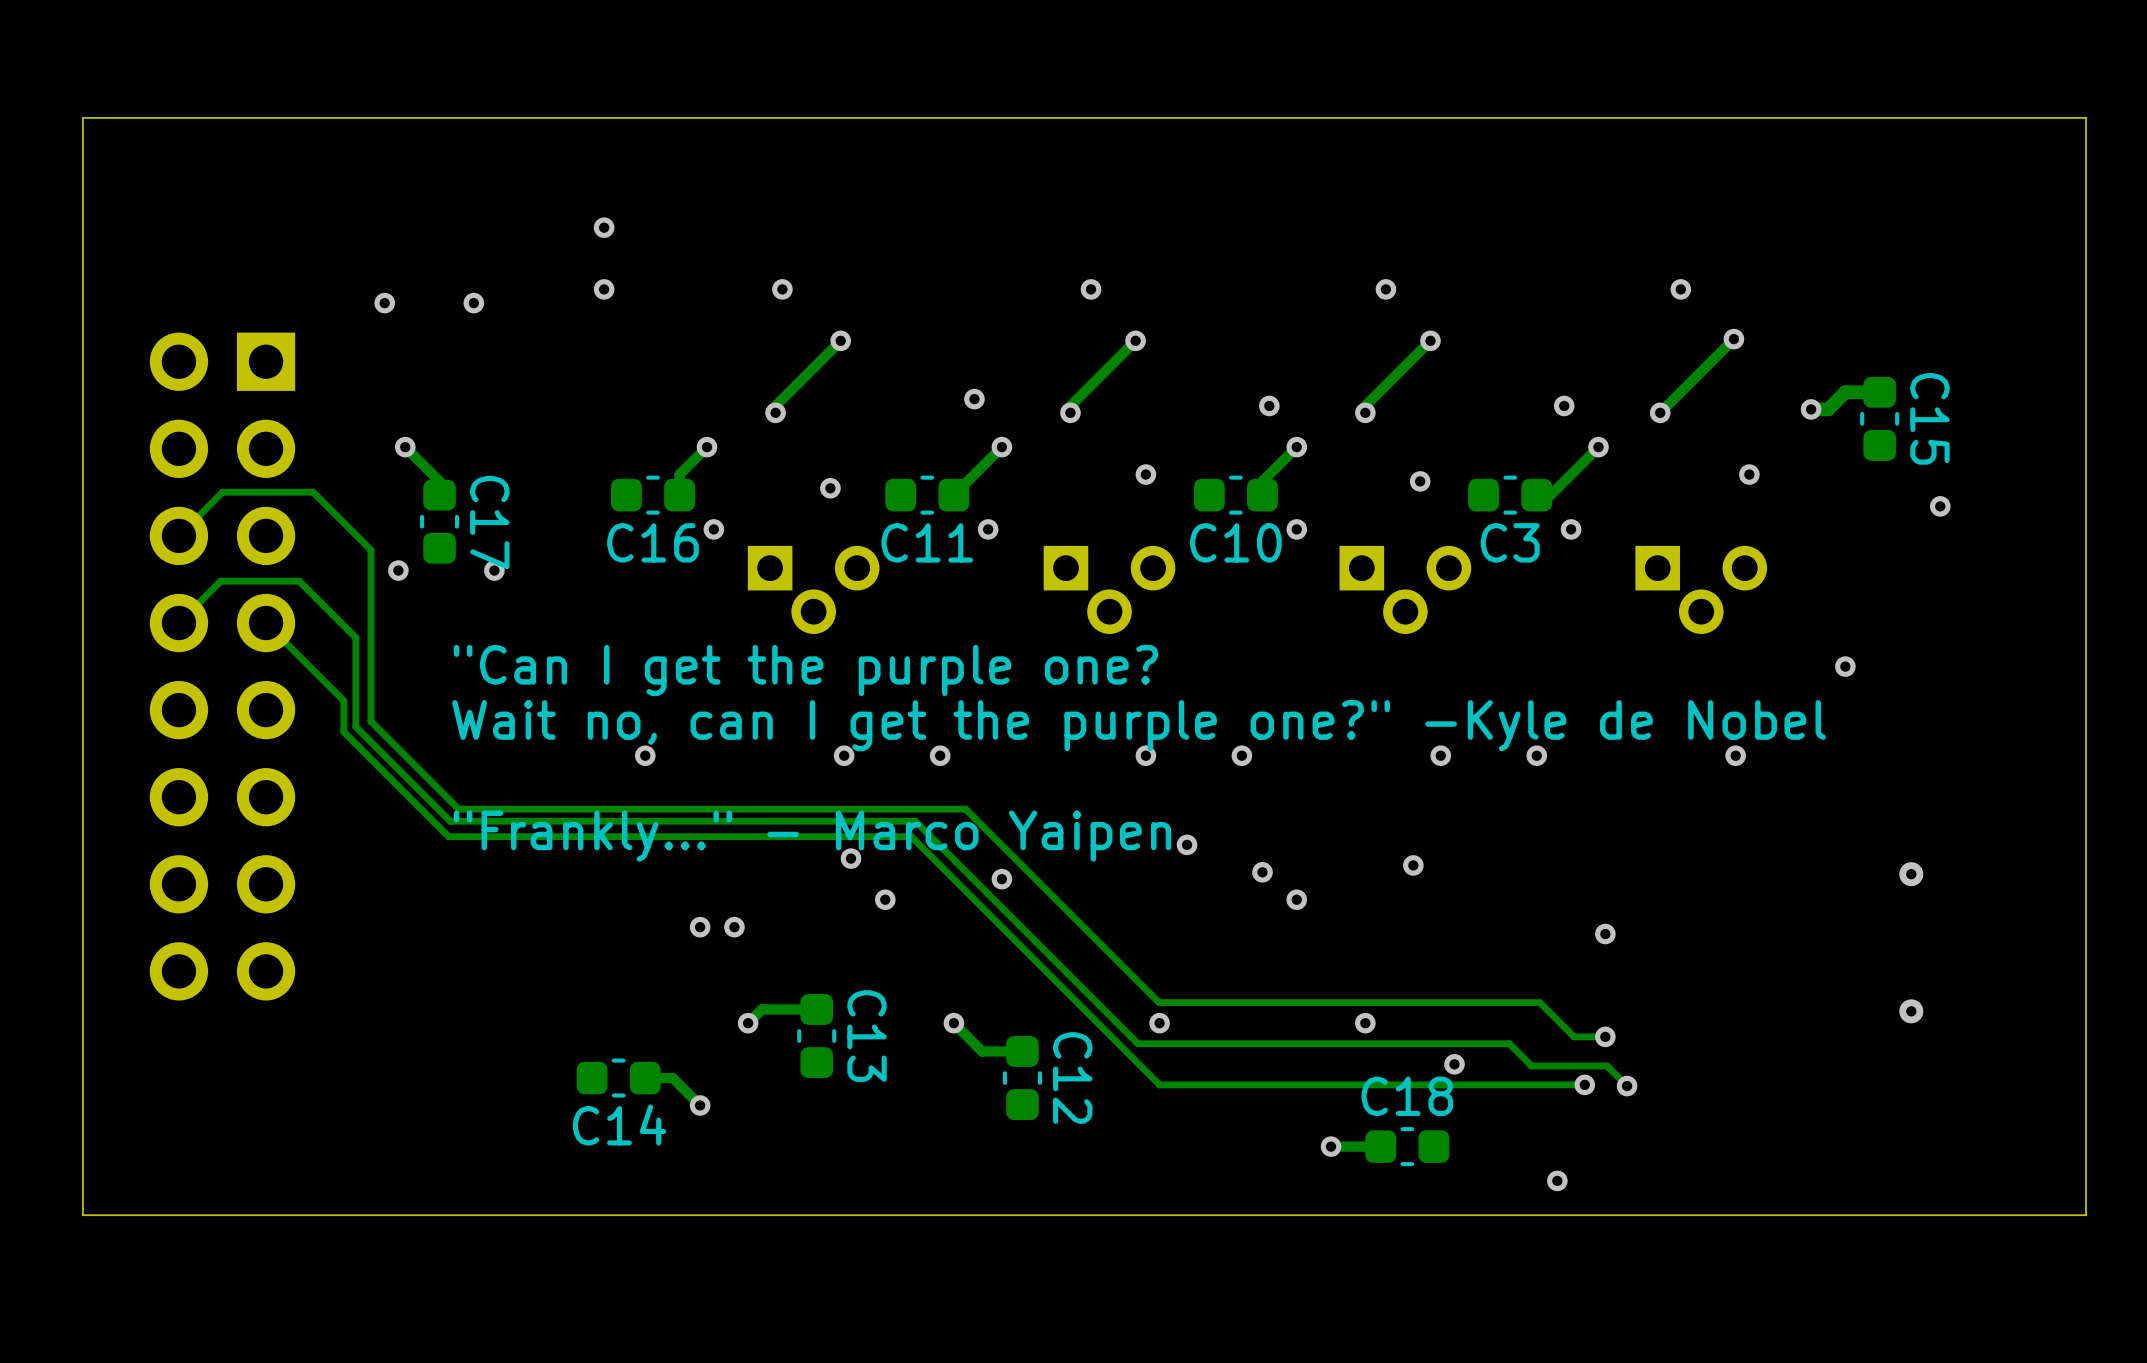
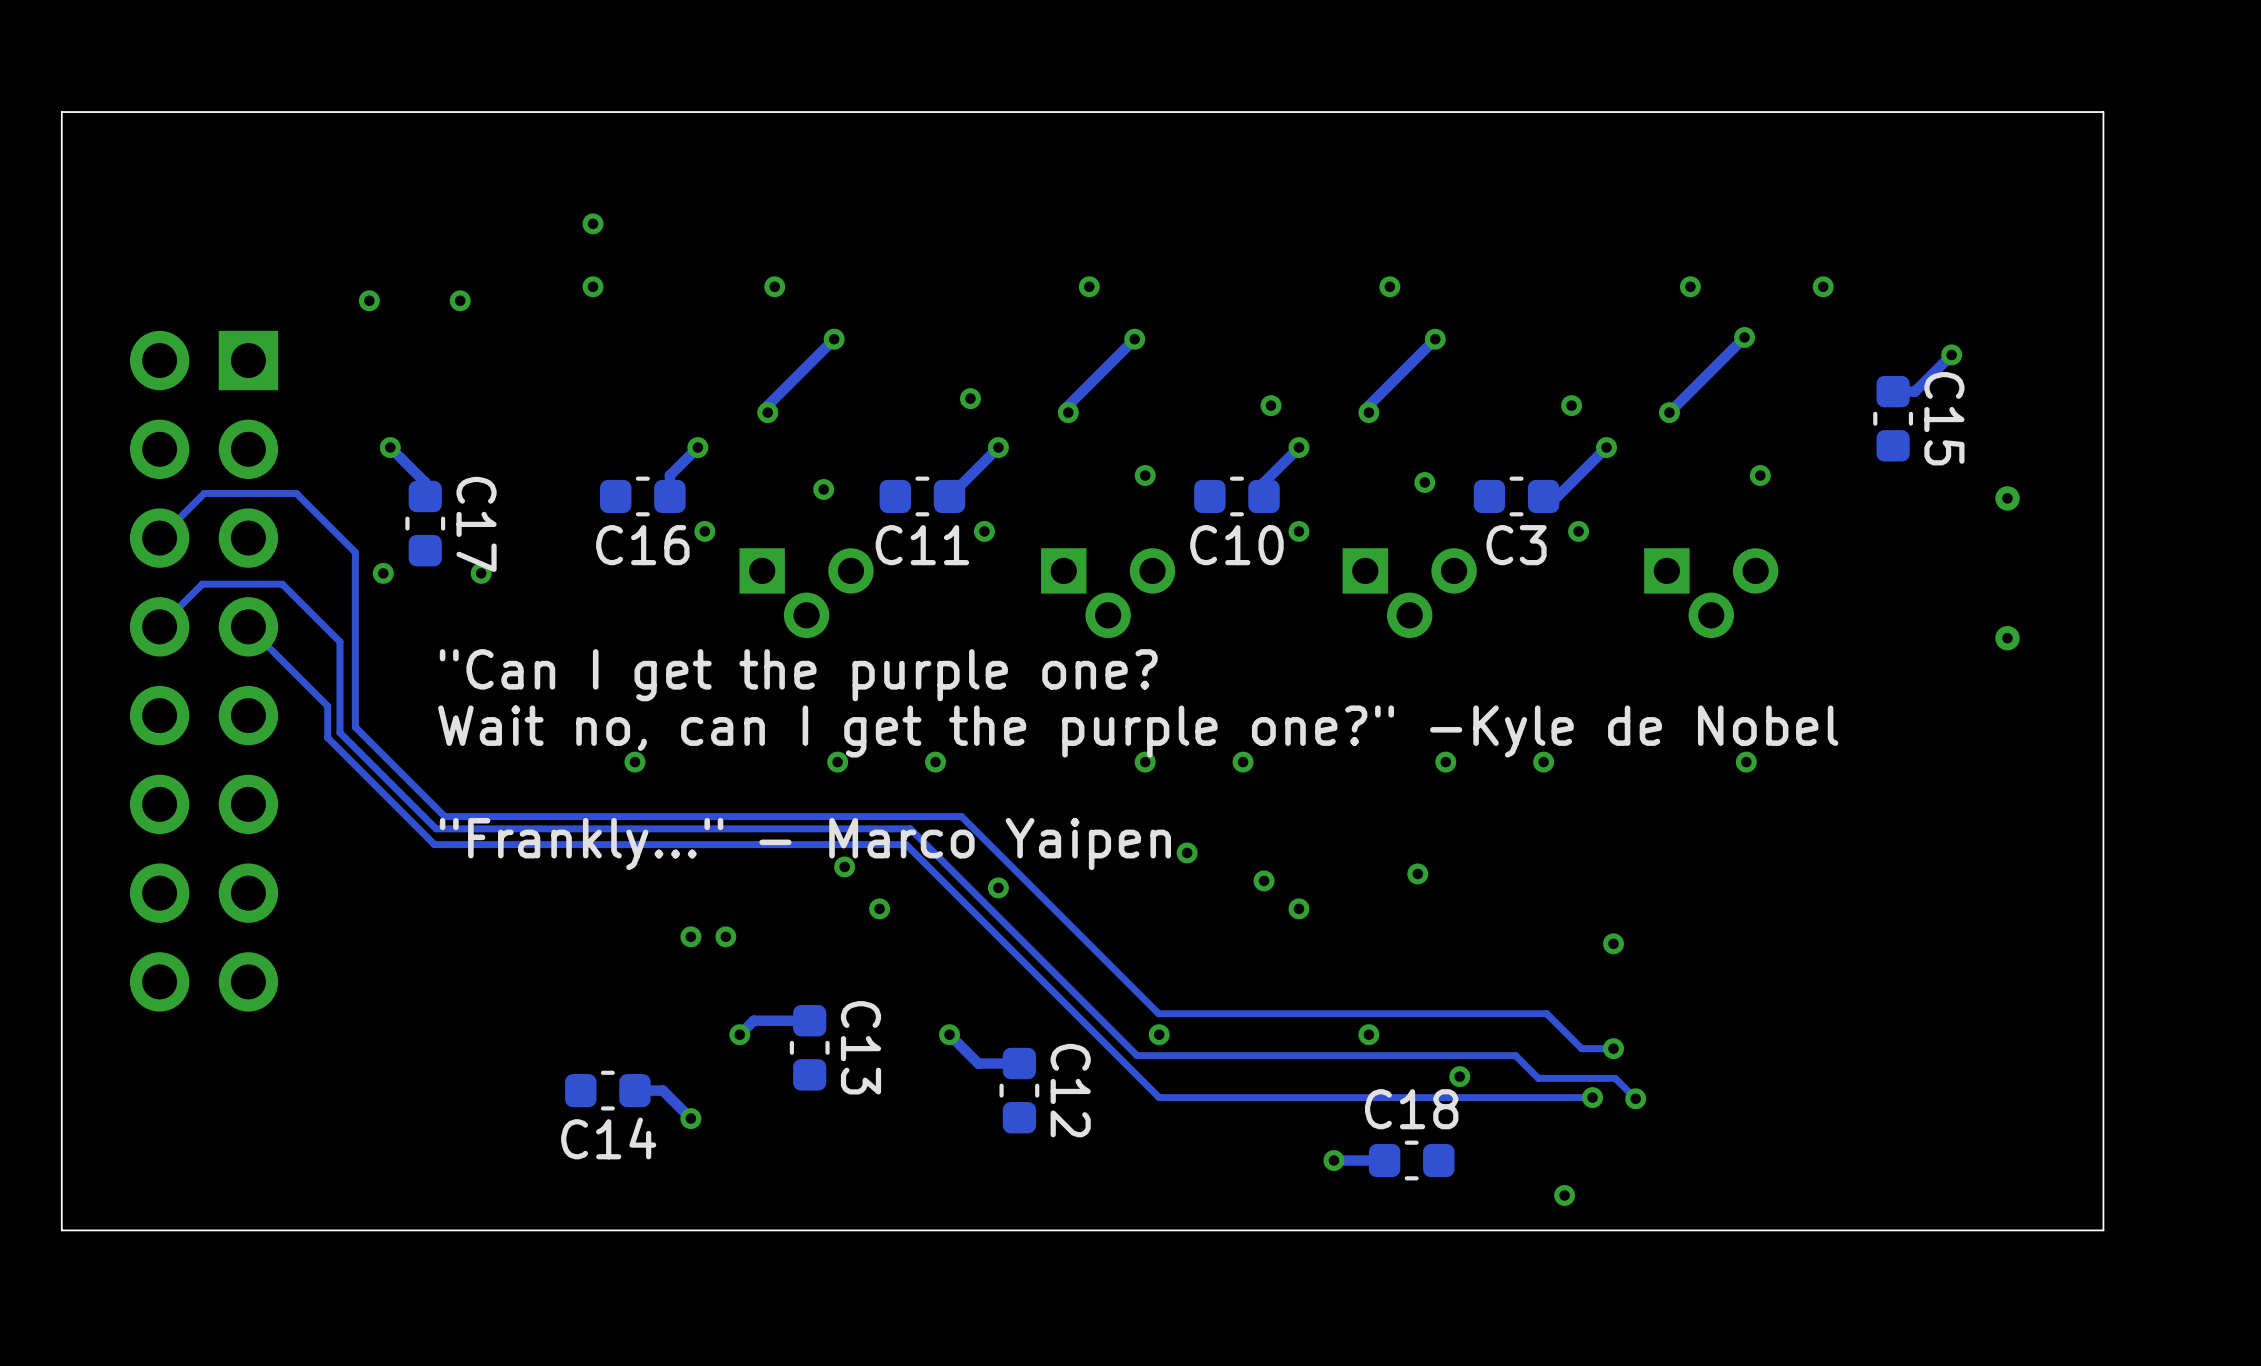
via: none -> (1823, 286)
via: none -> (1951, 354)
track: (1879, 392) (1845, 392) (1828, 409) (1811, 409) -> (1893, 391) (1914, 391) (1951, 354)
via: (1811, 409) -> none
via: none -> (2007, 498)
via: (1940, 506) -> none
via: none -> (2007, 638)
via: (1845, 666) -> none
via: (1911, 874) -> none
via: (1911, 1011) -> none

